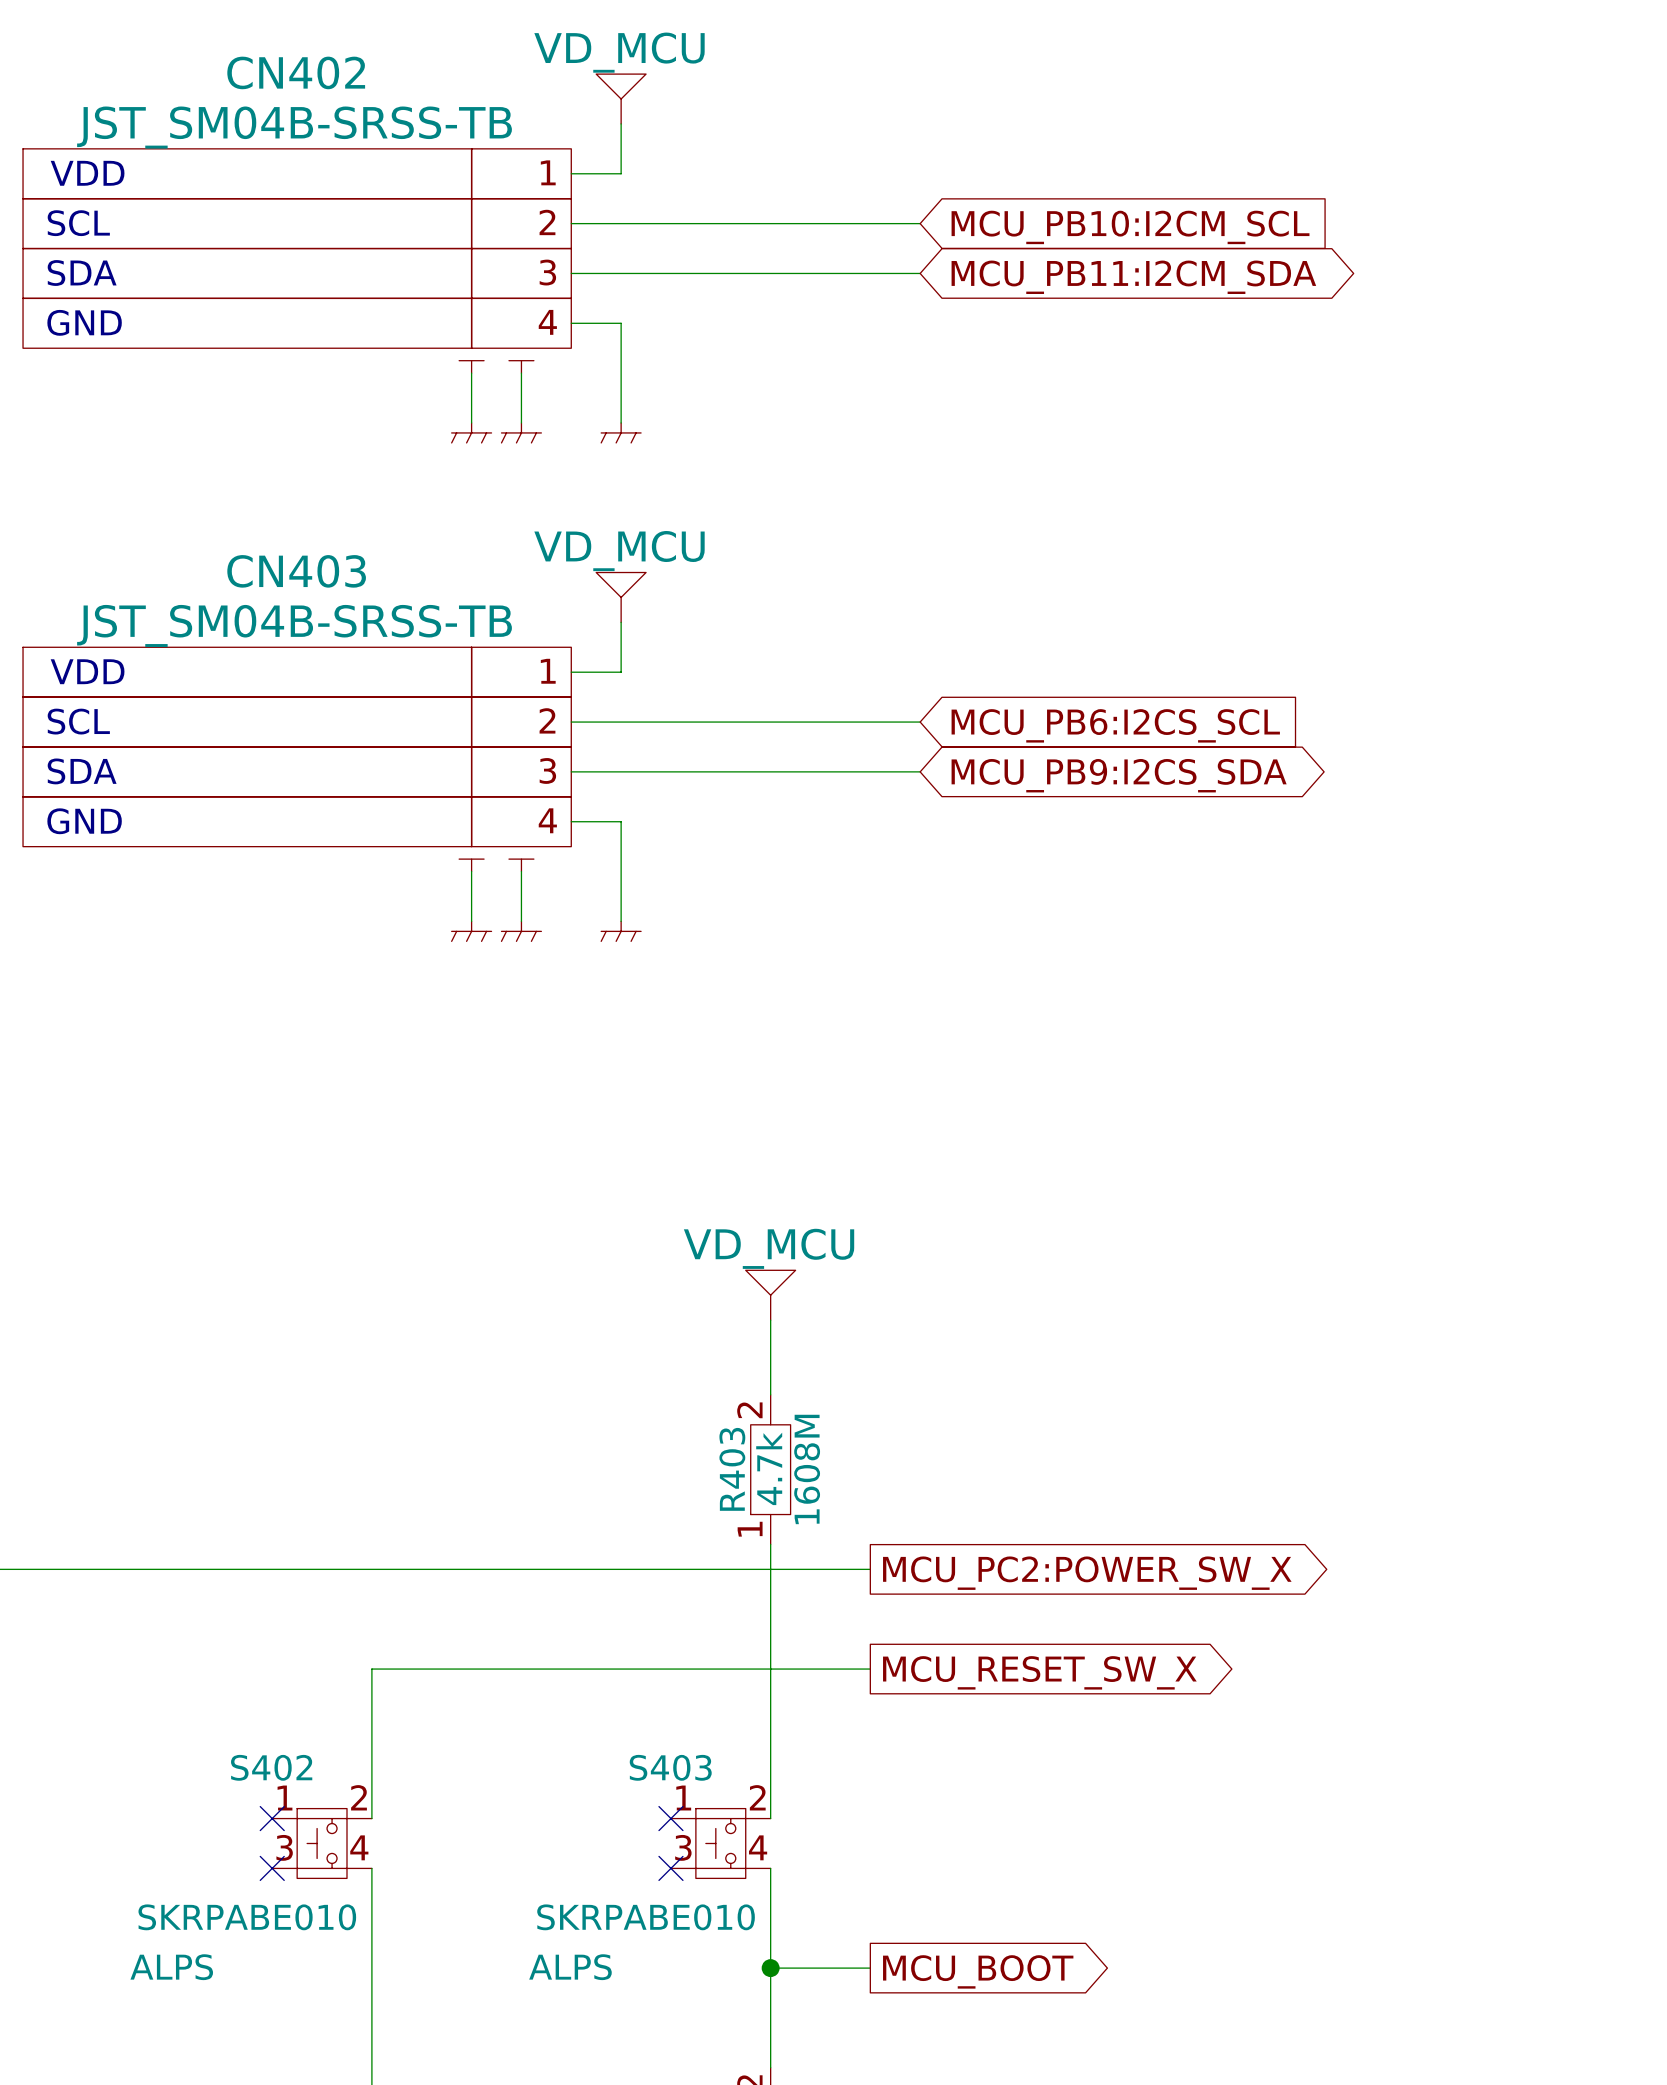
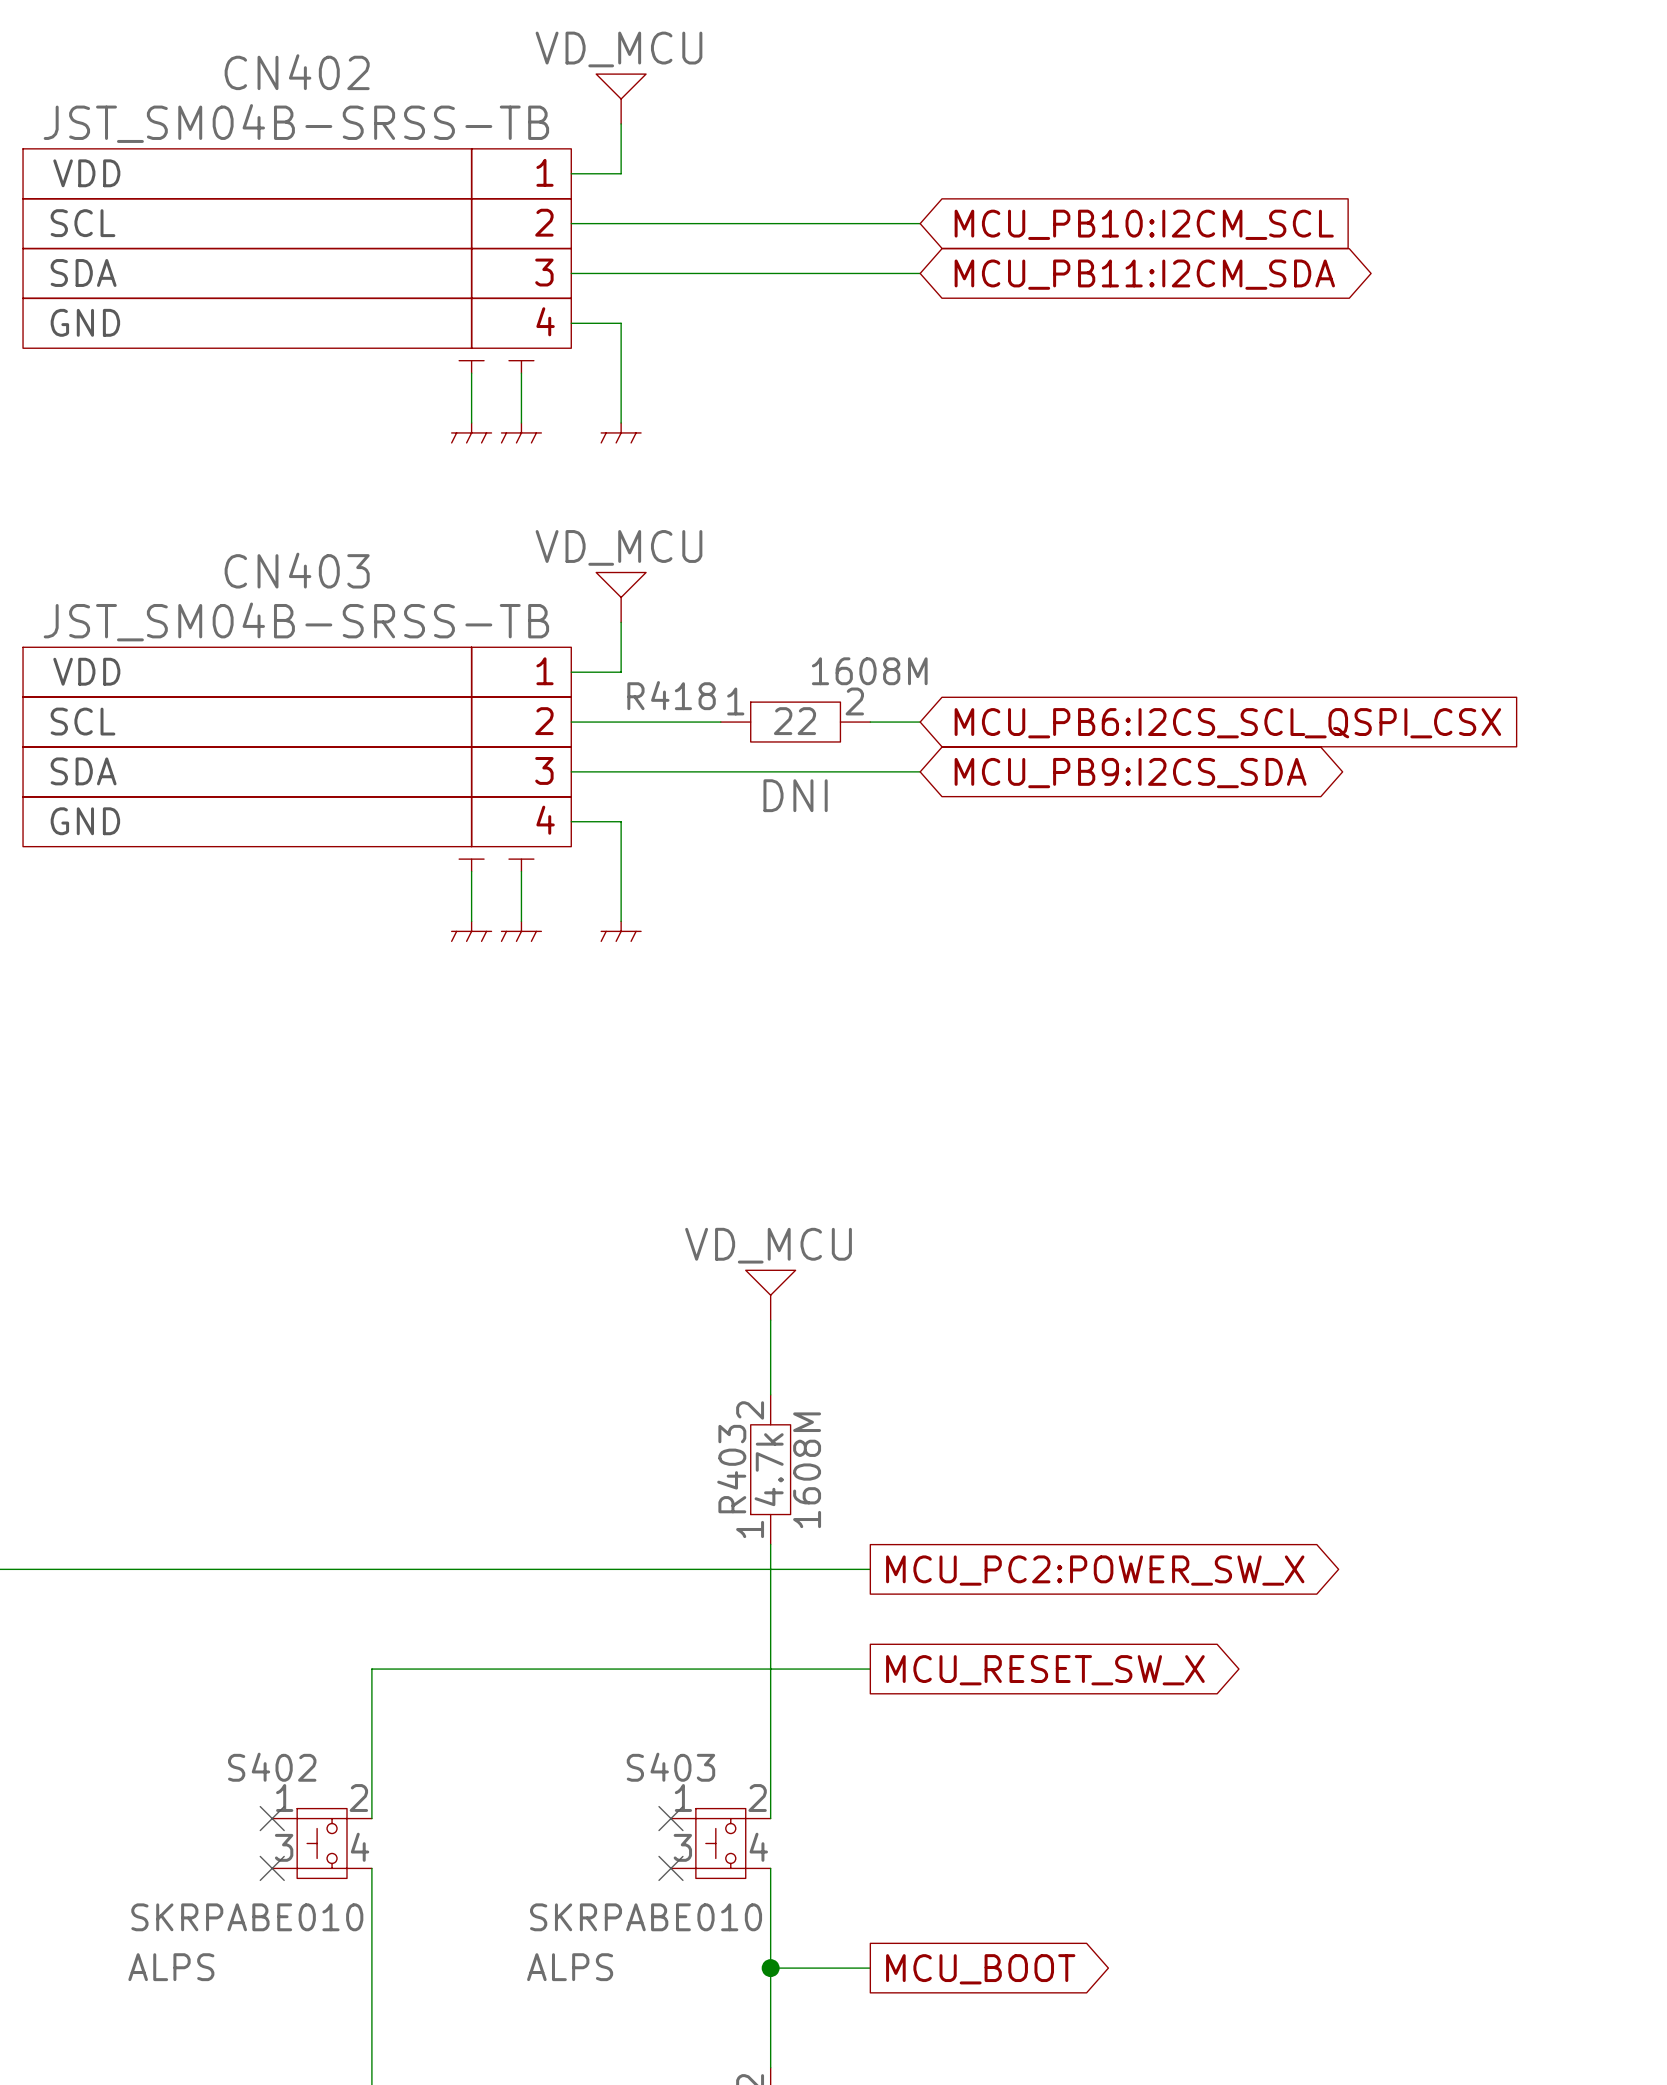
wire: (720, 722) (870, 722) -> none
R418: none -> 22 (795, 722)
global label: MCU_PB6:I2CS_SCL (1115, 725) -> MCU_PB6:I2CS_SCL_QSPI_CSX (1227, 723)

